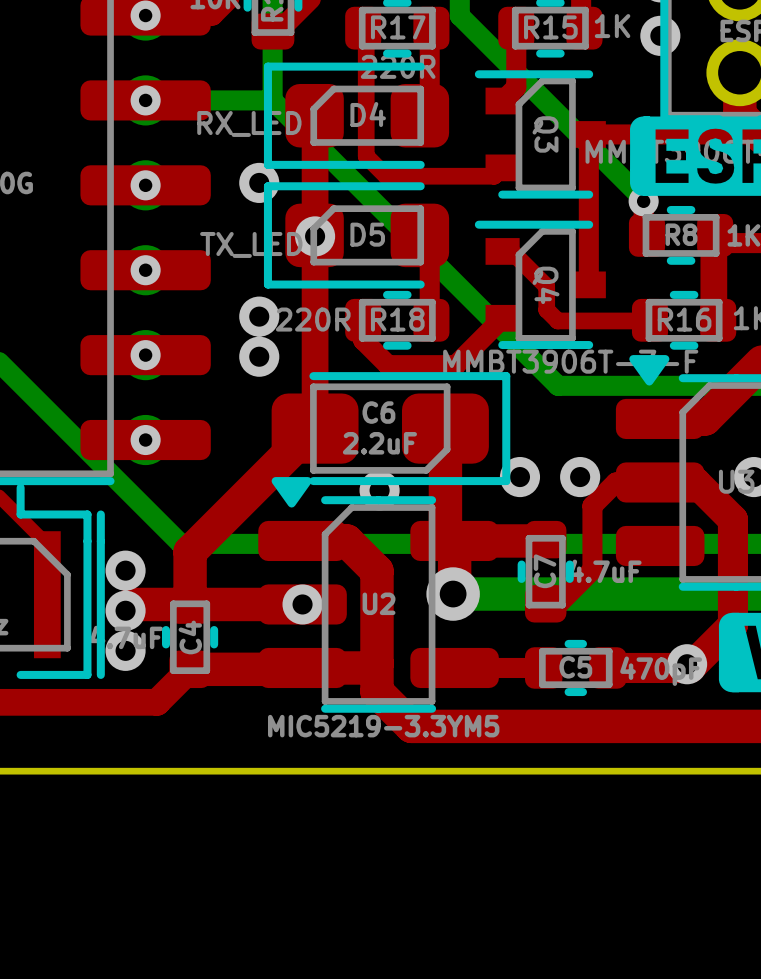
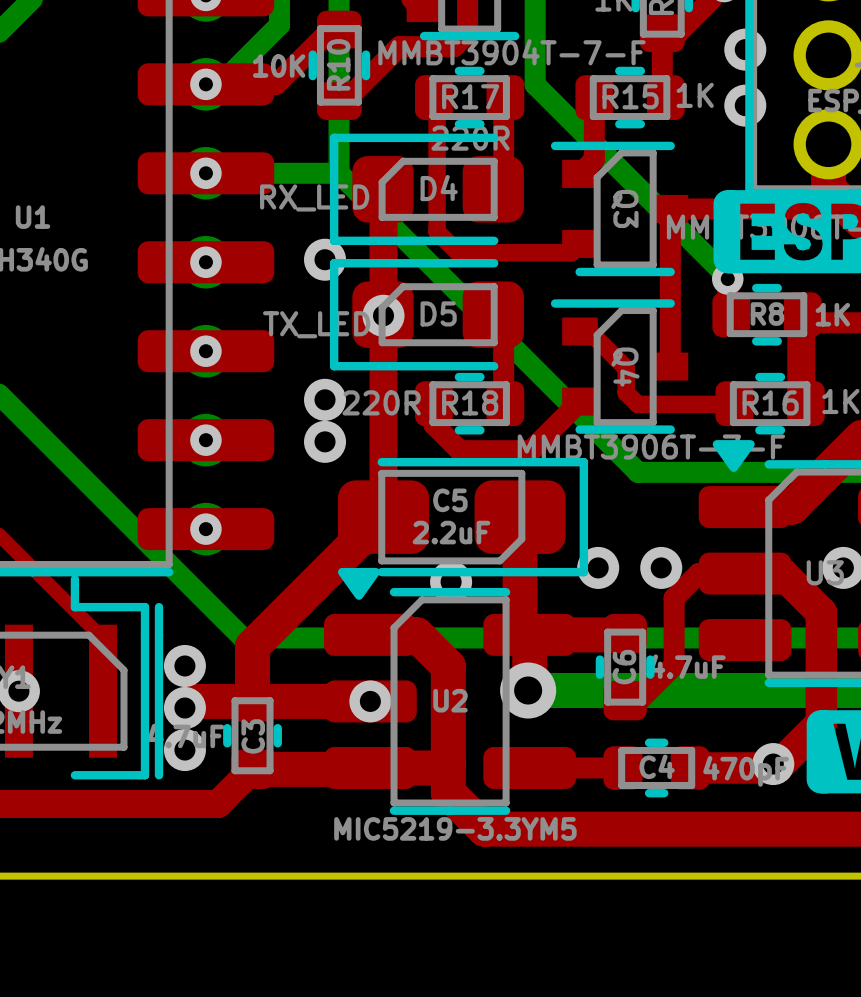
C6 name: C6 (378, 412) -> C5 (450, 500)
C7 name: C7 (545, 571) -> C6 (624, 667)
C4 name: C4 (190, 637) -> C3 (253, 736)
C5 name: C5 (575, 667) -> C4 (657, 766)

